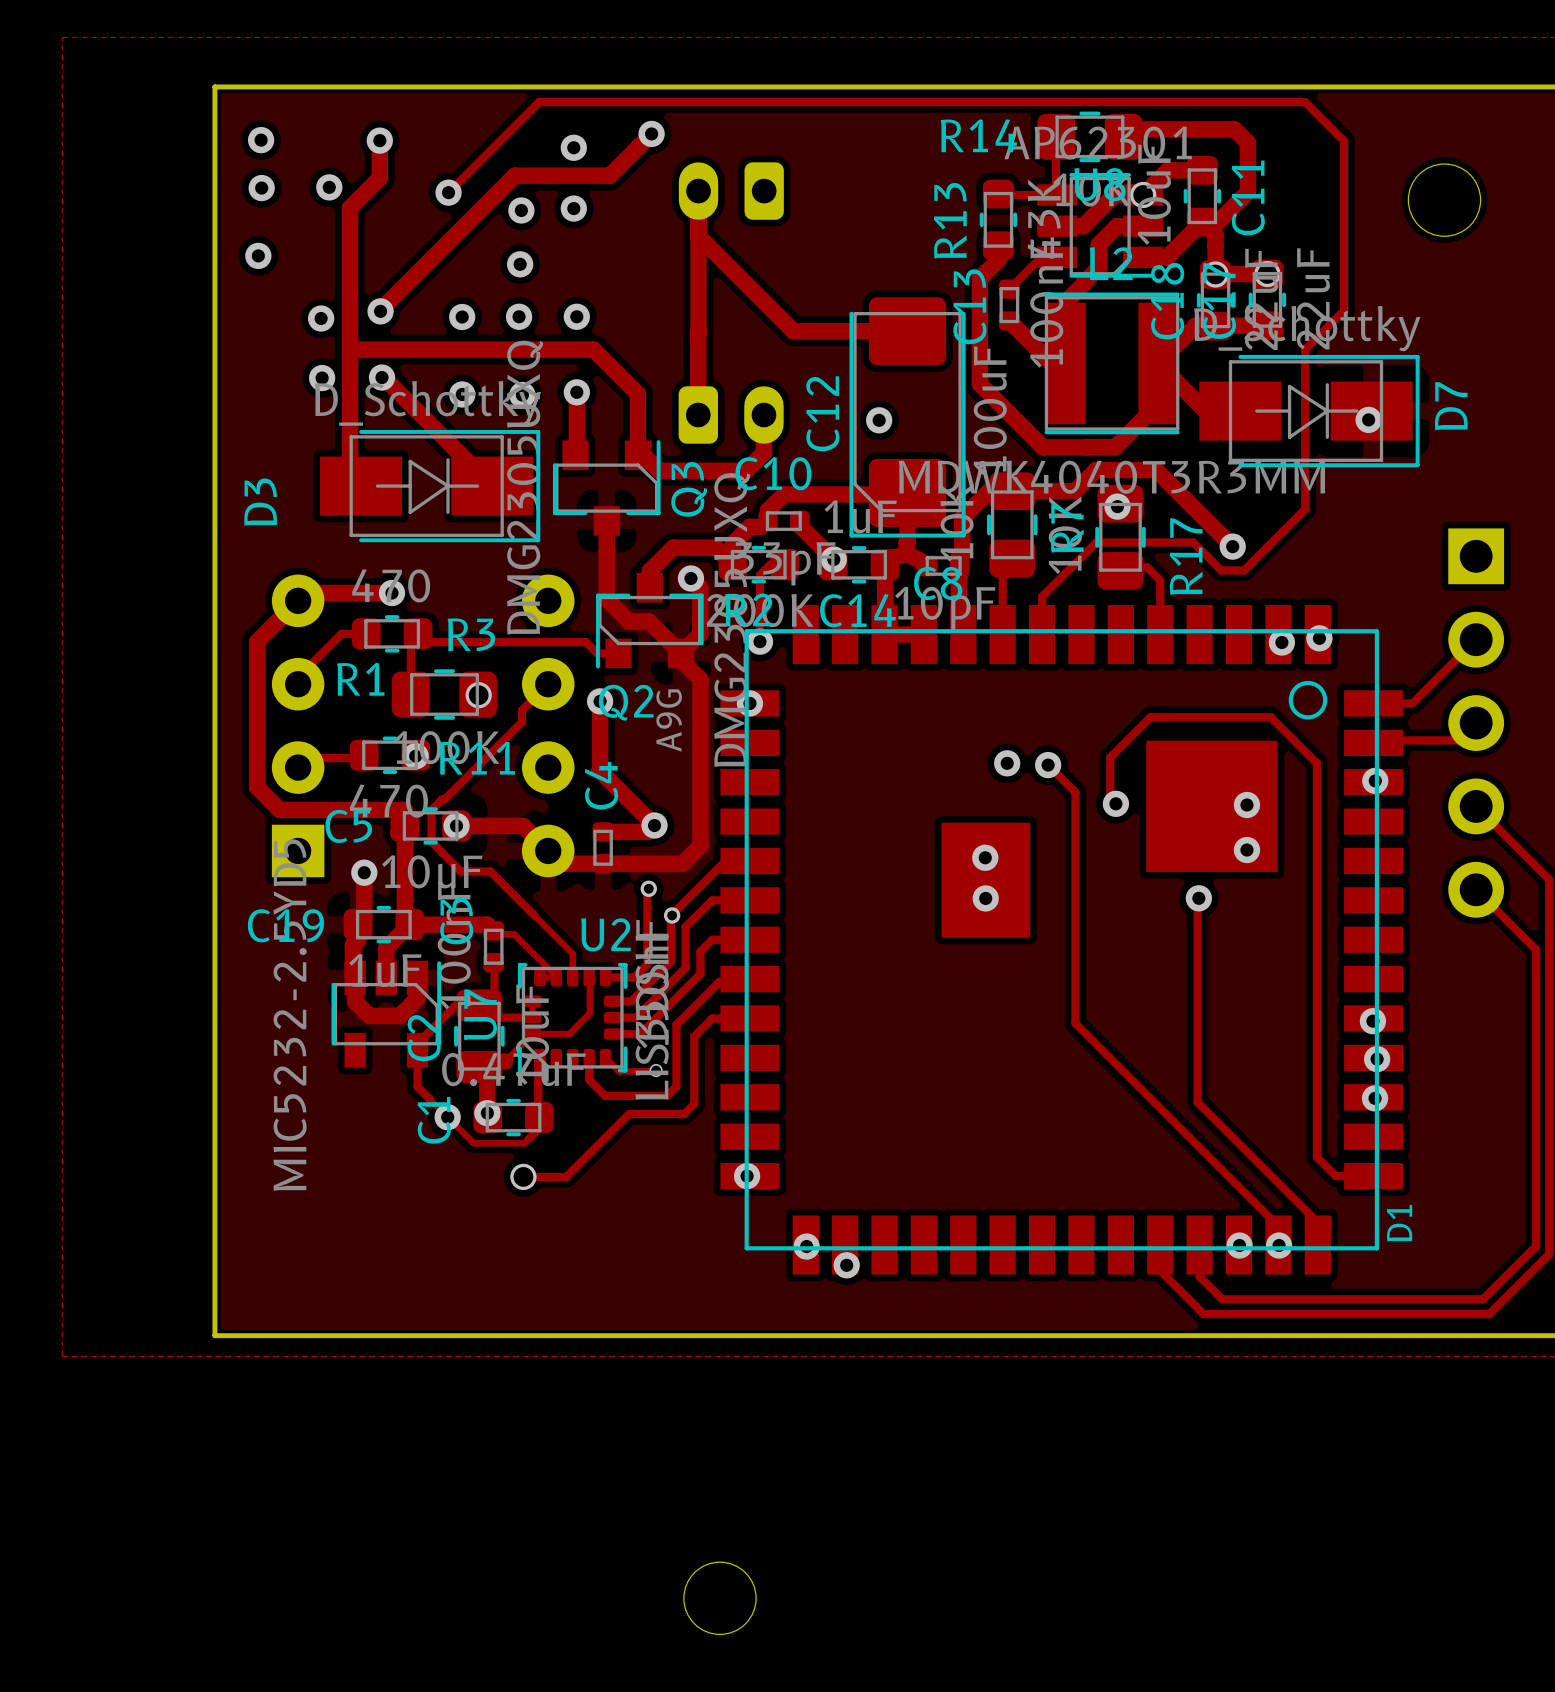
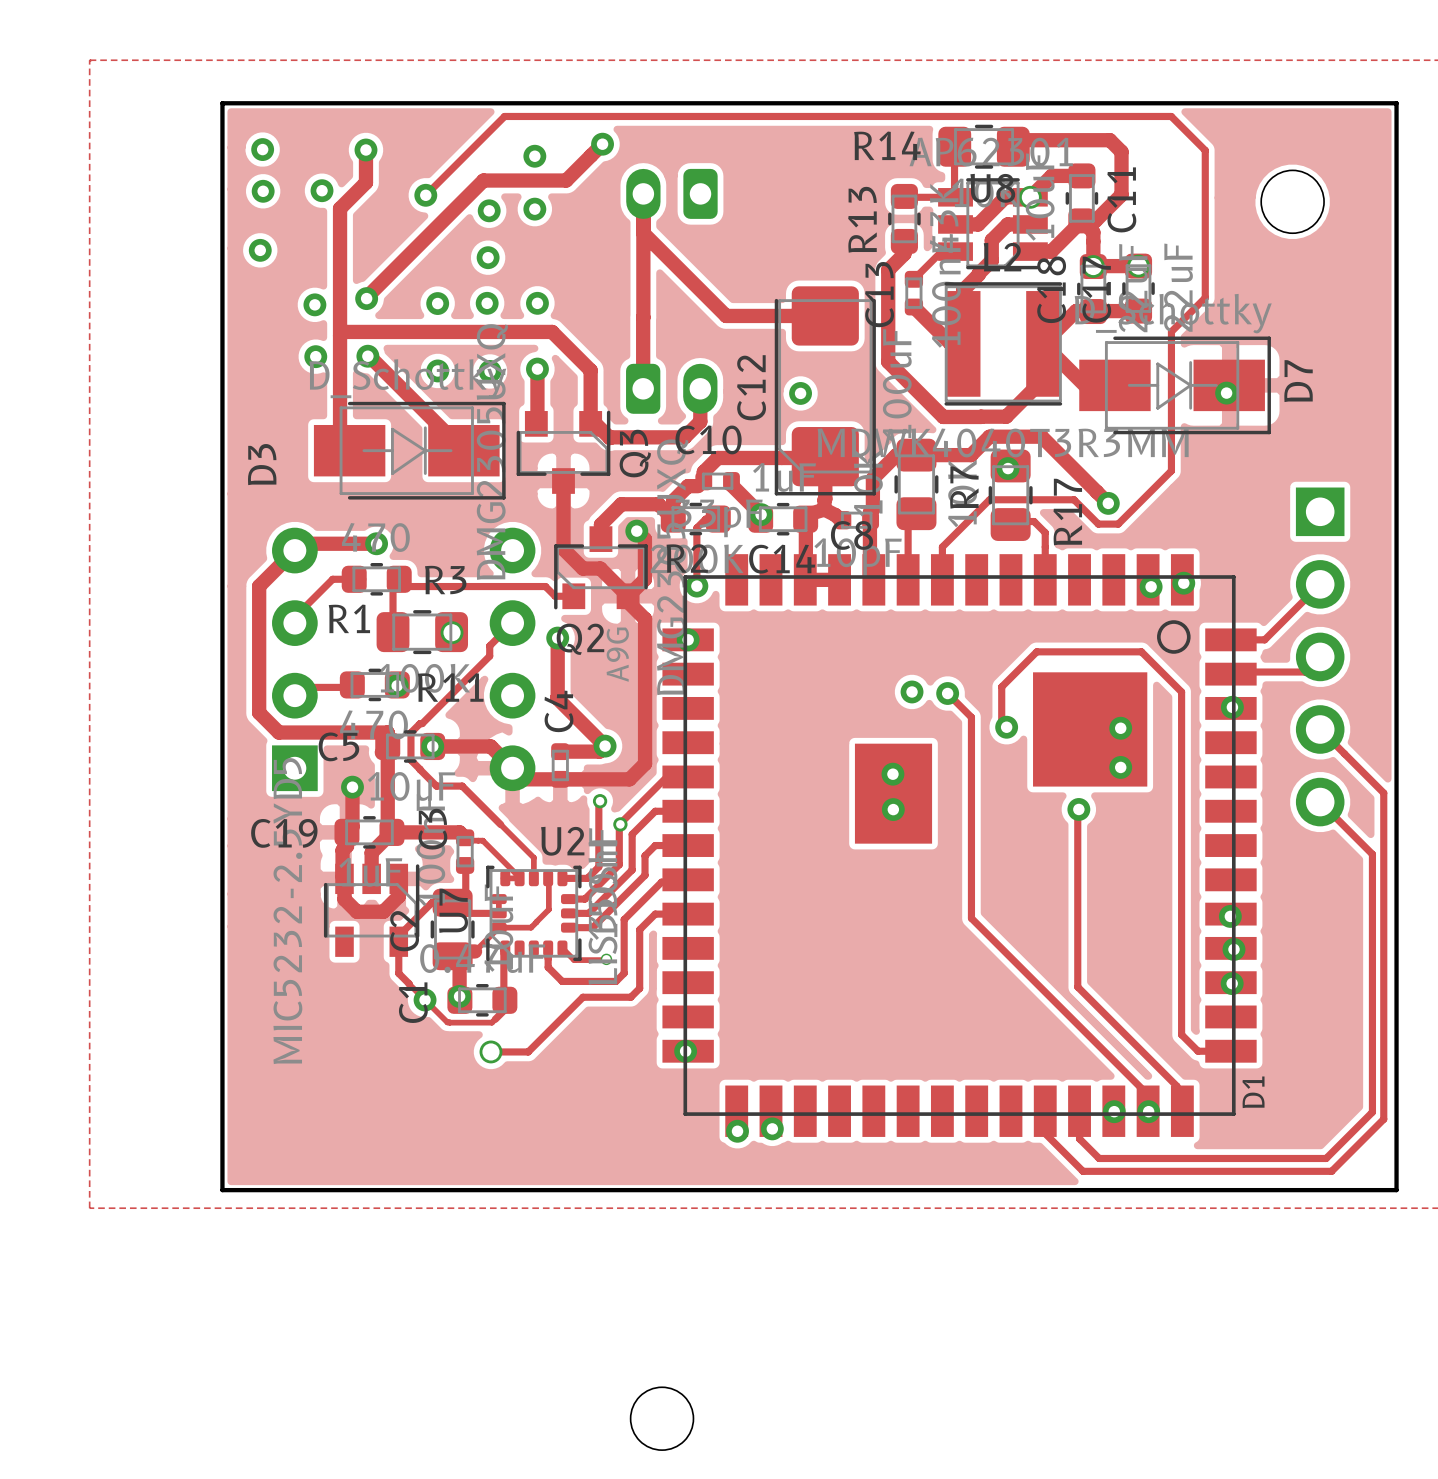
via position: (806, 1246) -> (737, 1131)

